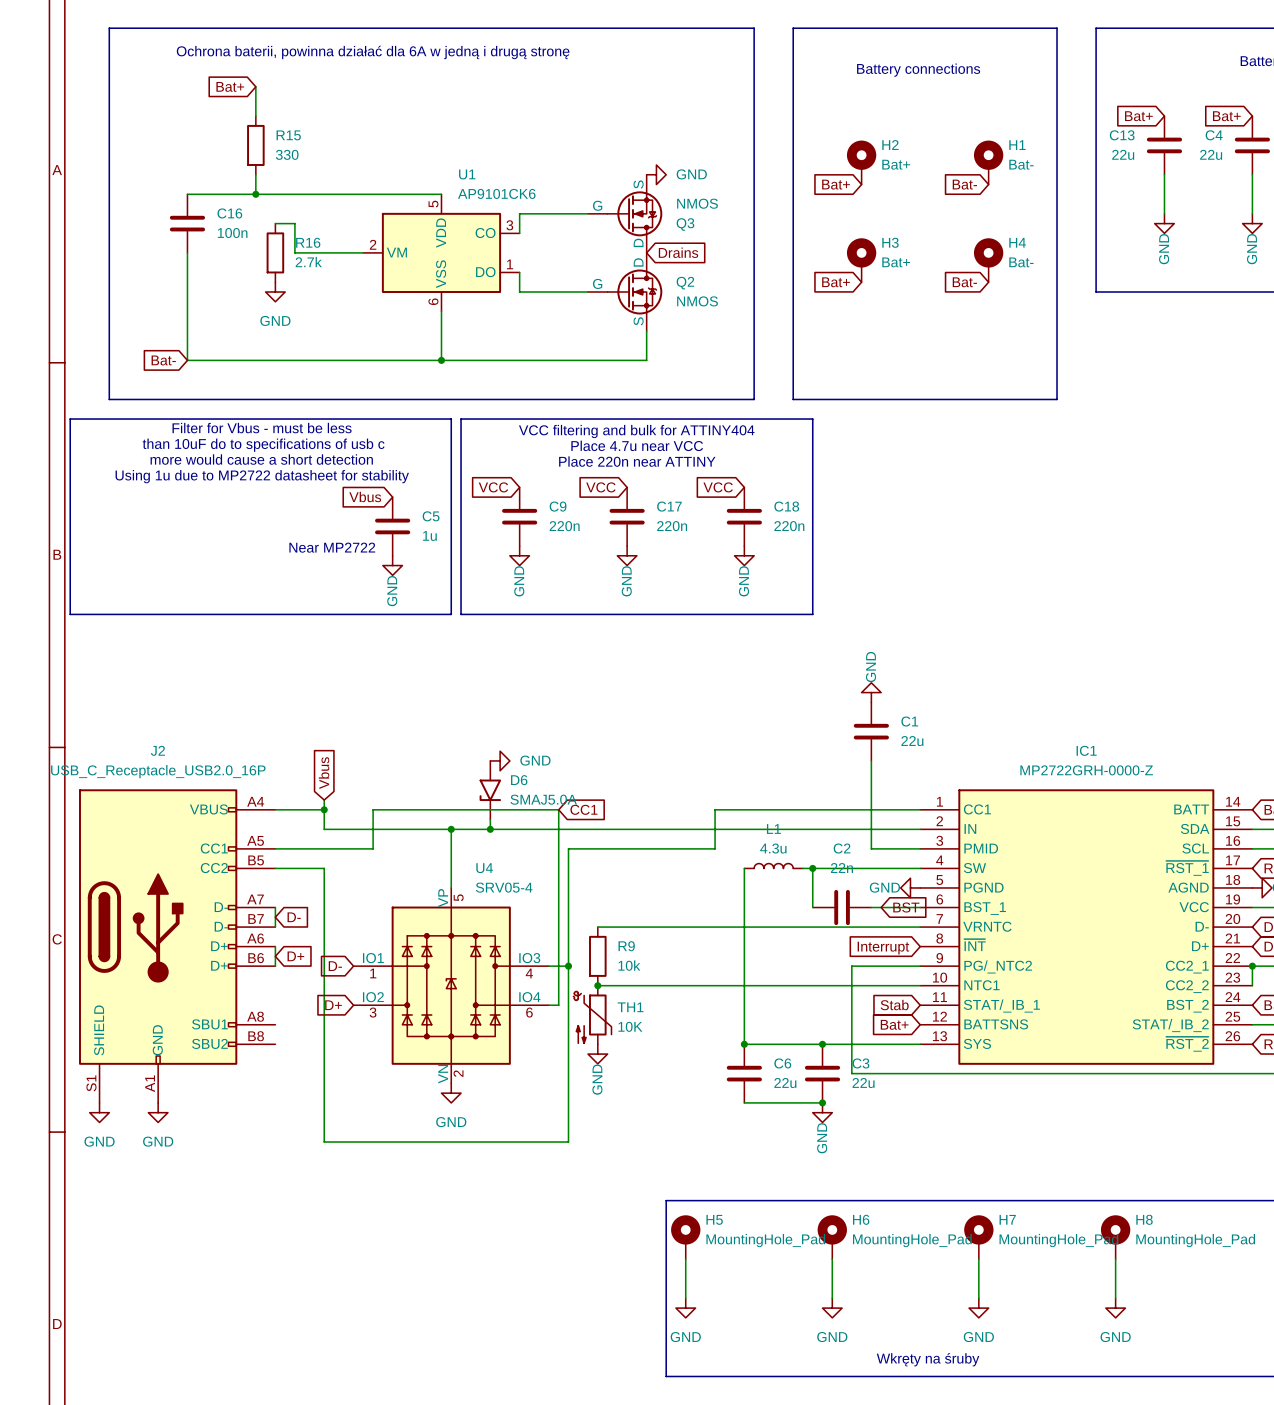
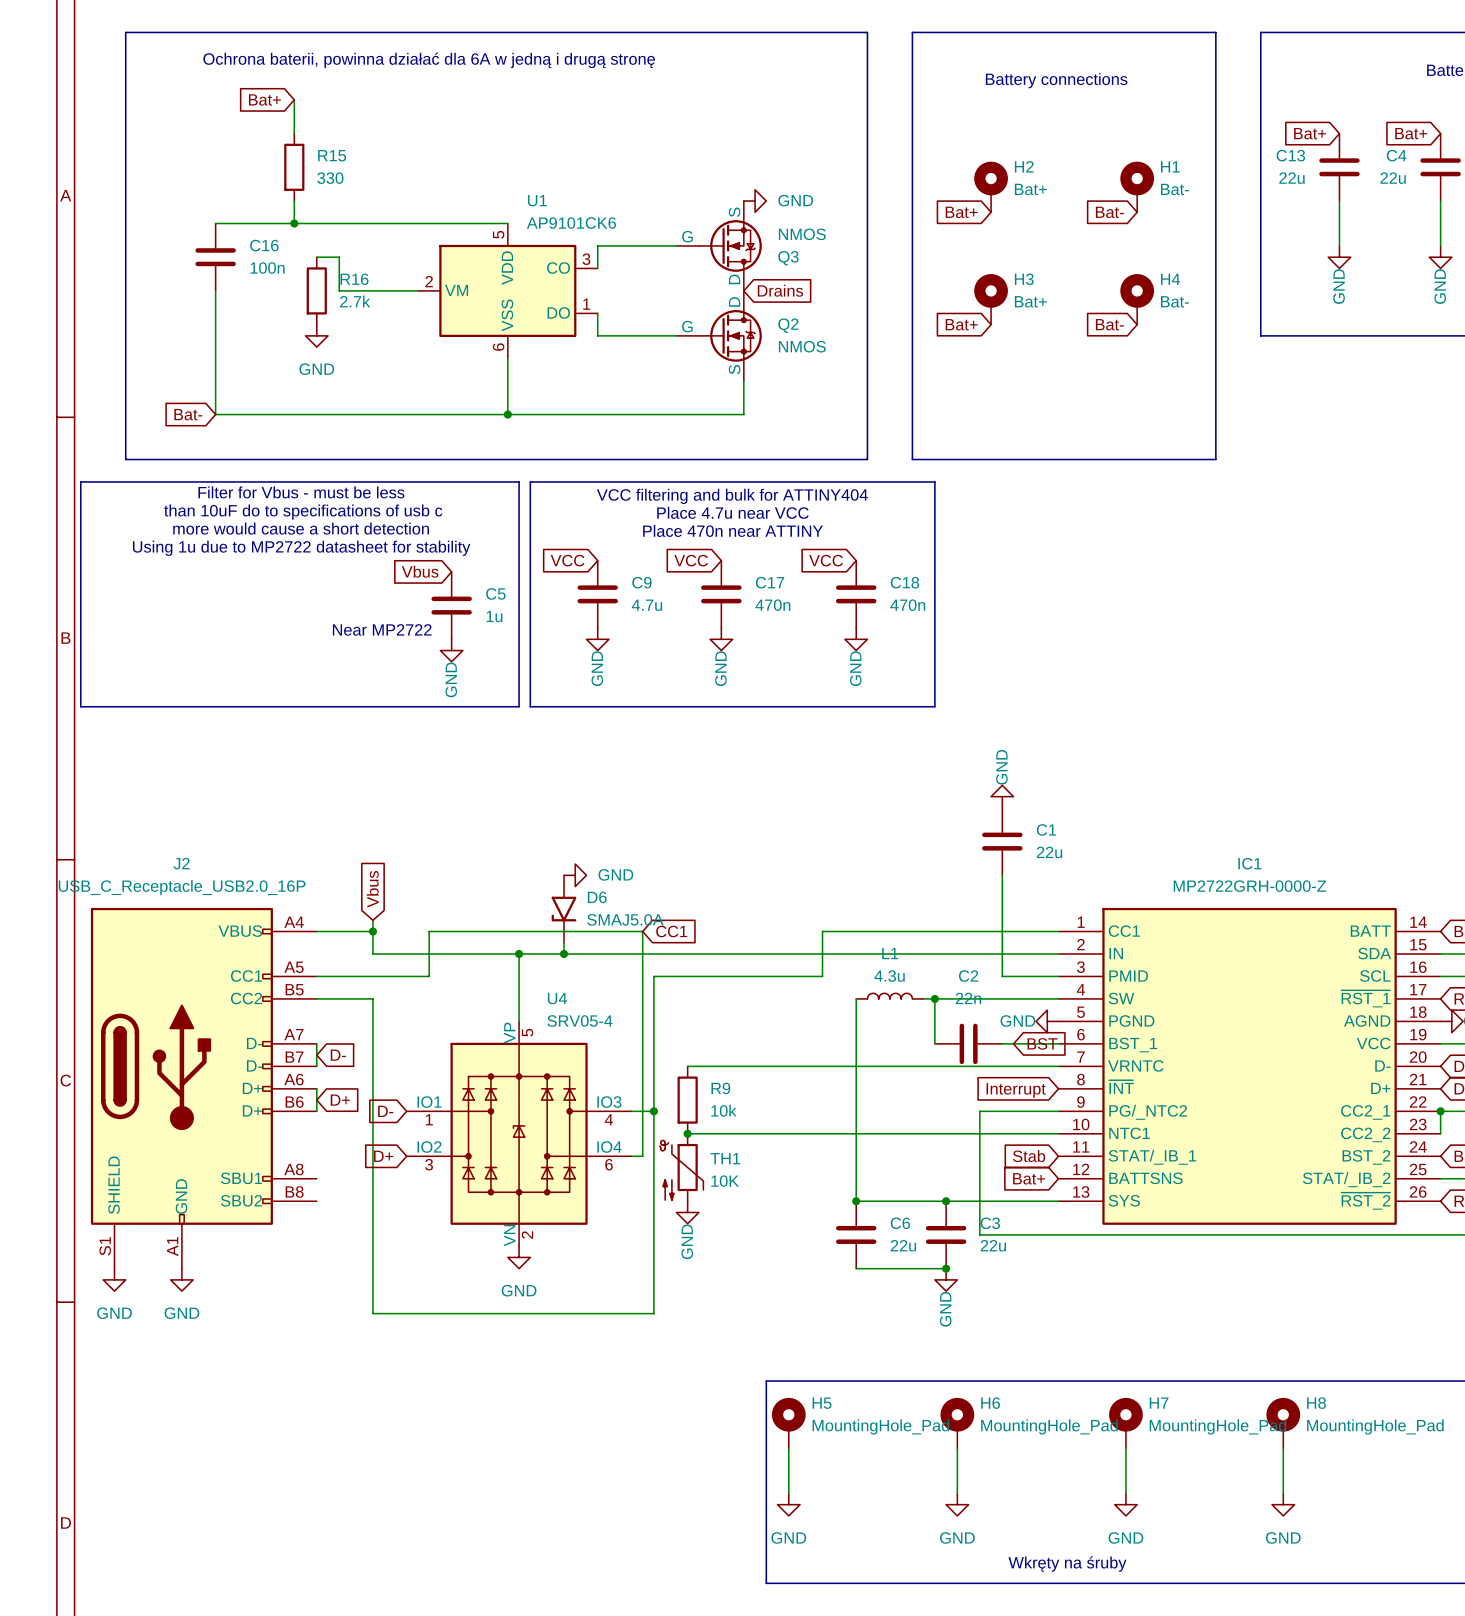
text: Place 220n near ATTINY (637, 461) -> Place 470n near ATTINY (733, 530)
C9 value: 220n (564, 526) -> 4.7u (646, 605)
C17 value: 220n (672, 526) -> 470n (772, 605)
C18 value: 220n (789, 526) -> 470n (907, 605)

